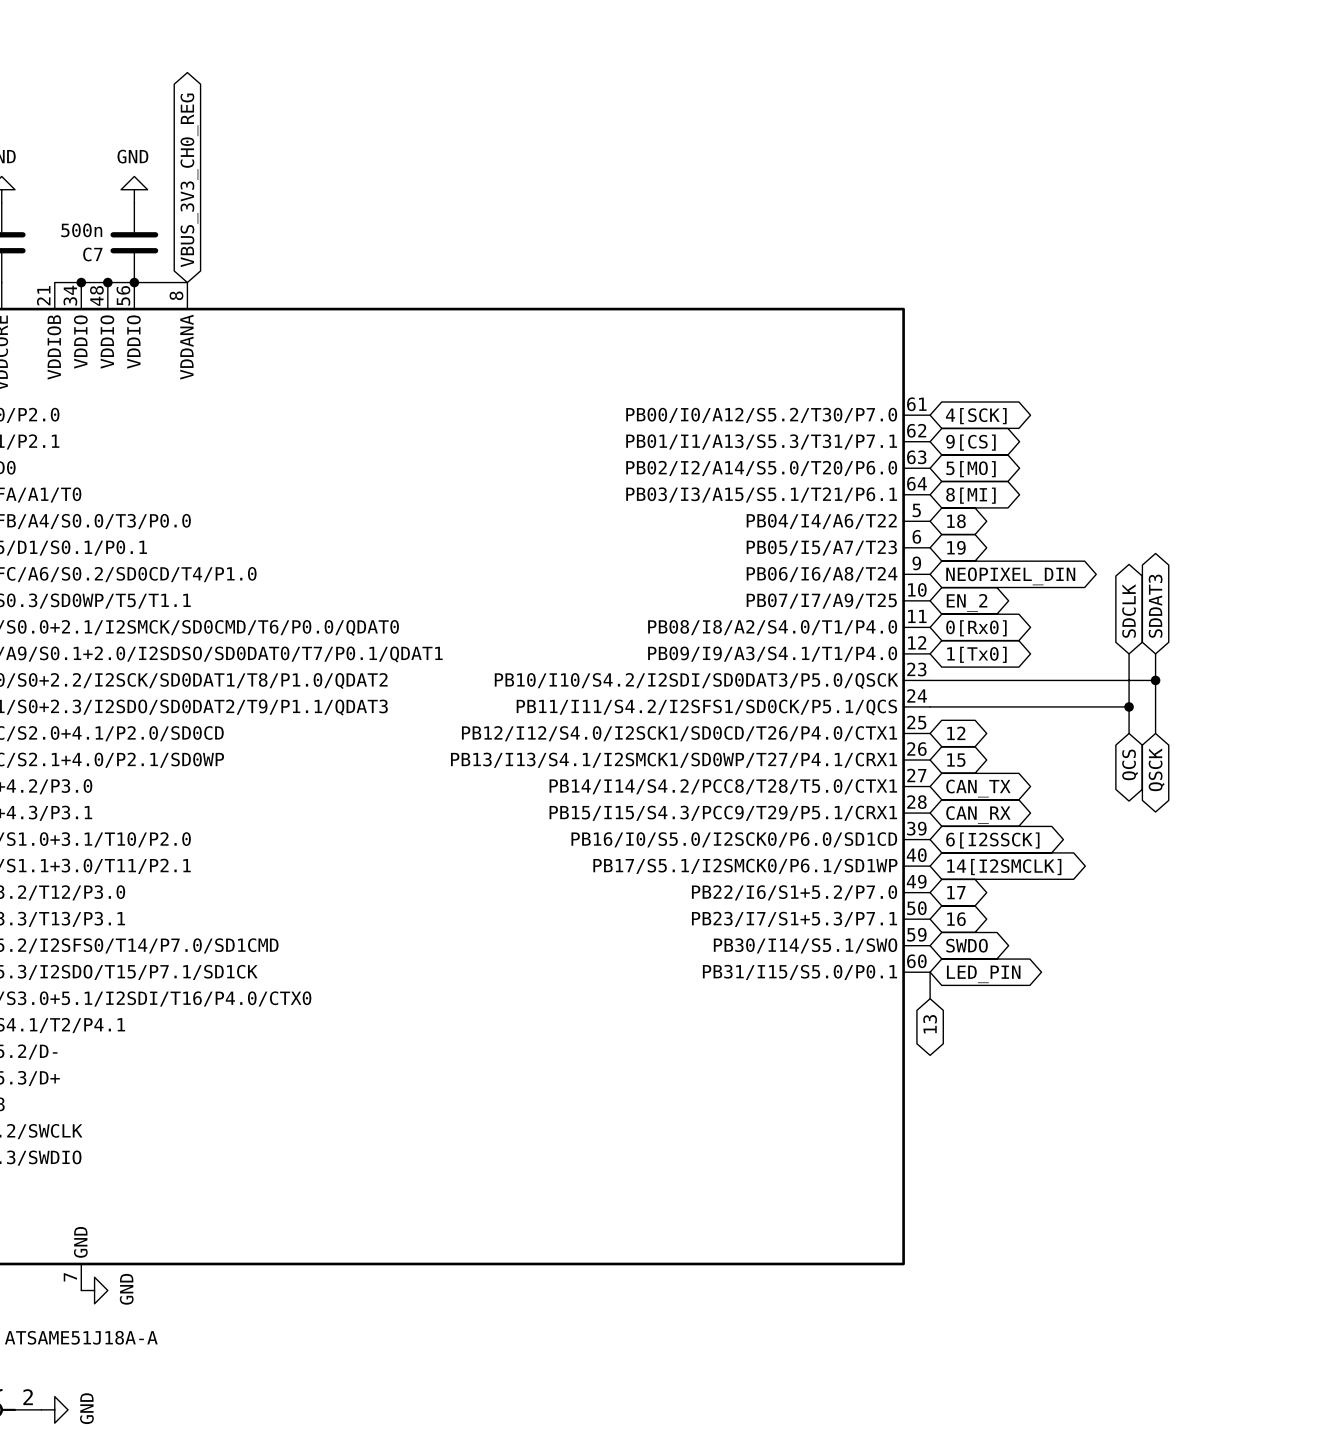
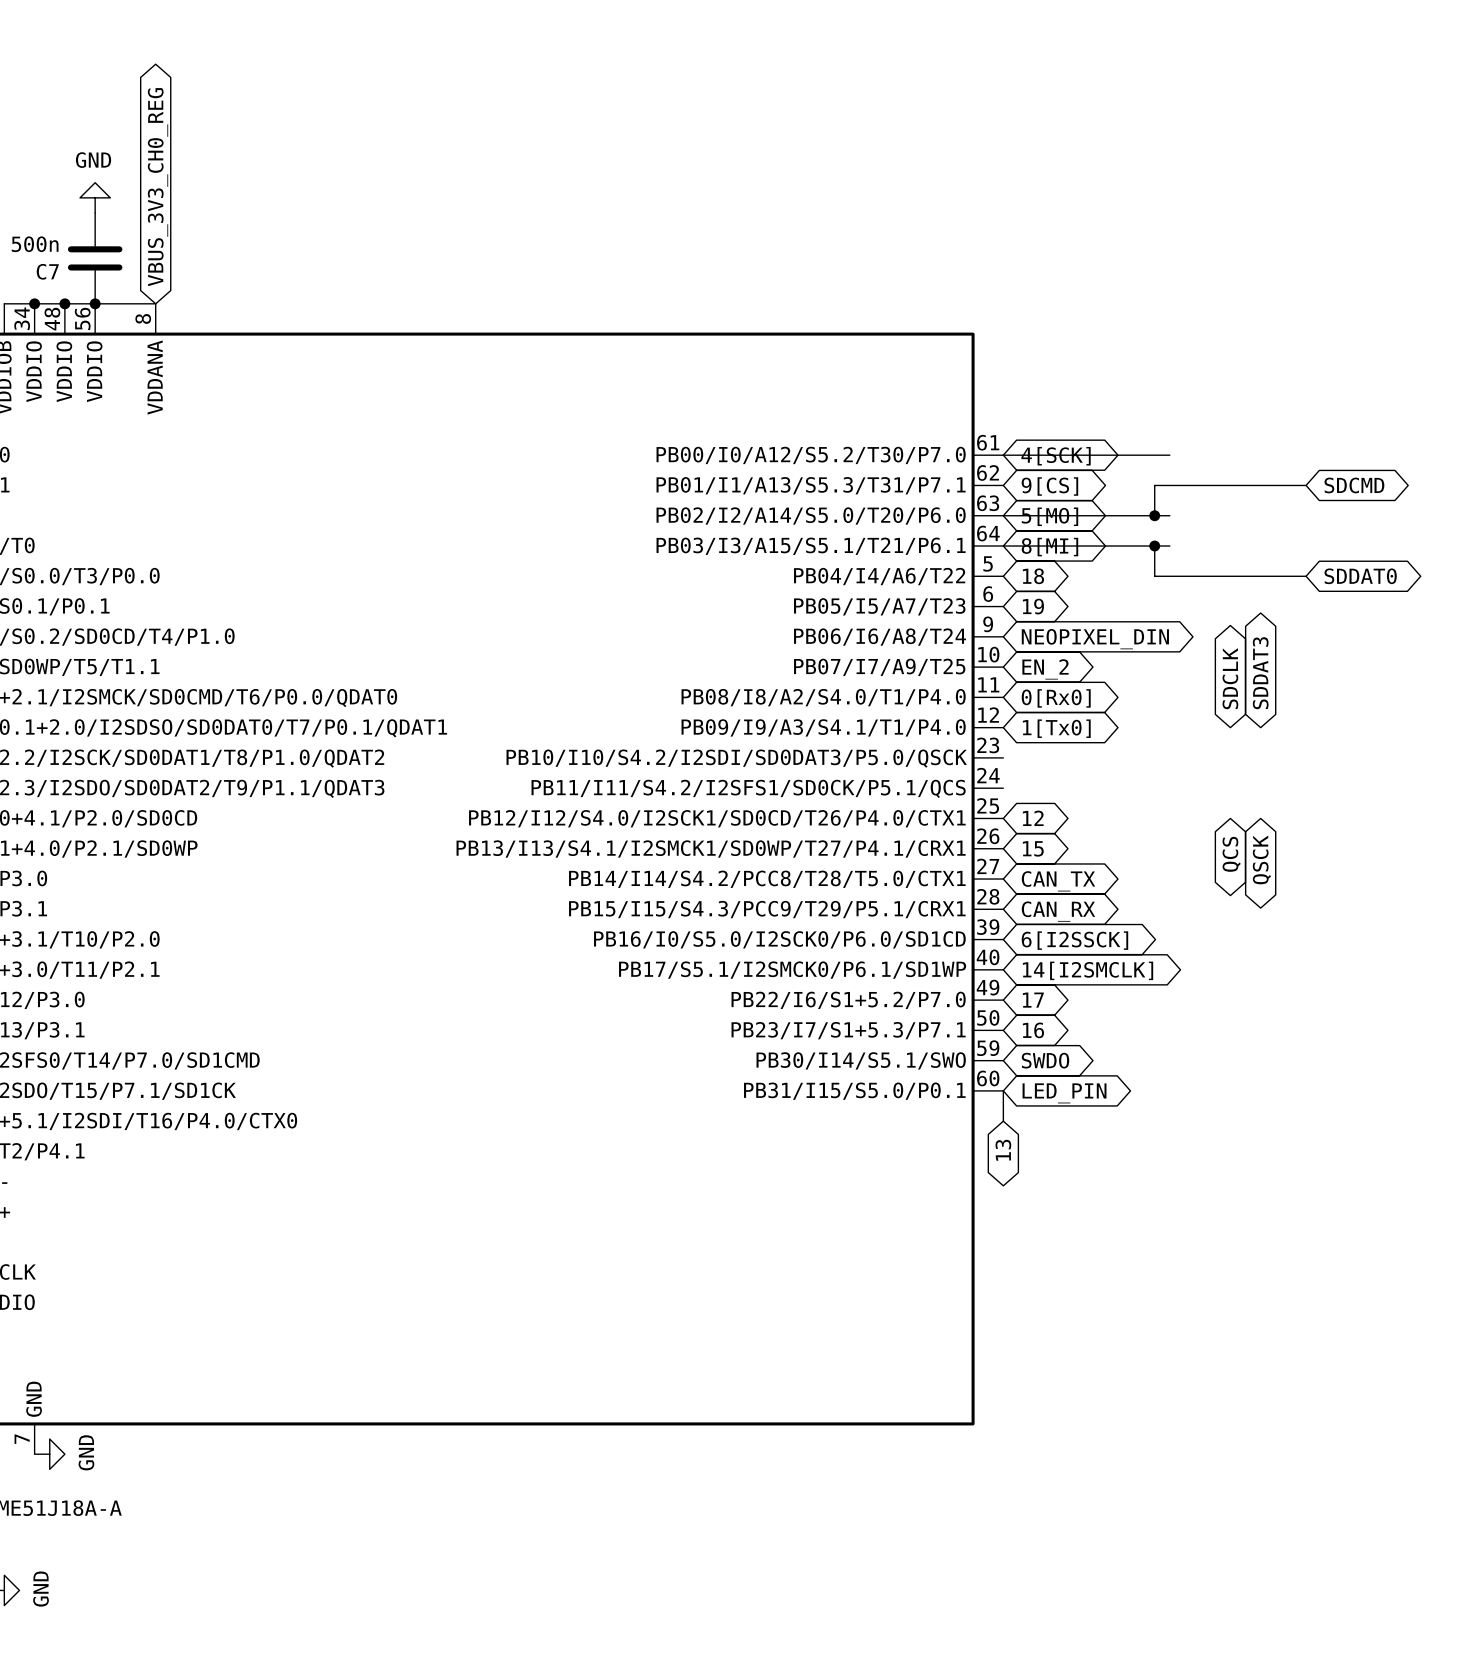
wire: none -> (1003, 455) (1169, 455)
wire: none -> (1306, 485) (1154, 485) (1154, 515)
global label: none -> SDCMD (1354, 485)
wire: none -> (1003, 515) (1169, 515)
junction: none -> (1154, 515)
wire: none -> (1003, 546) (1169, 546)
wire: none -> (1154, 546) (1154, 576) (1306, 576)
junction: none -> (1154, 546)
global label: none -> SDDAT0 (1360, 576)
wire: (1129, 653) (1129, 733) -> none
wire: (1155, 653) (1155, 733) -> none
wire: (930, 680) (1155, 680) -> none
junction: (1155, 680) -> none
wire: (930, 706) (1129, 706) -> none
junction: (1129, 706) -> none

